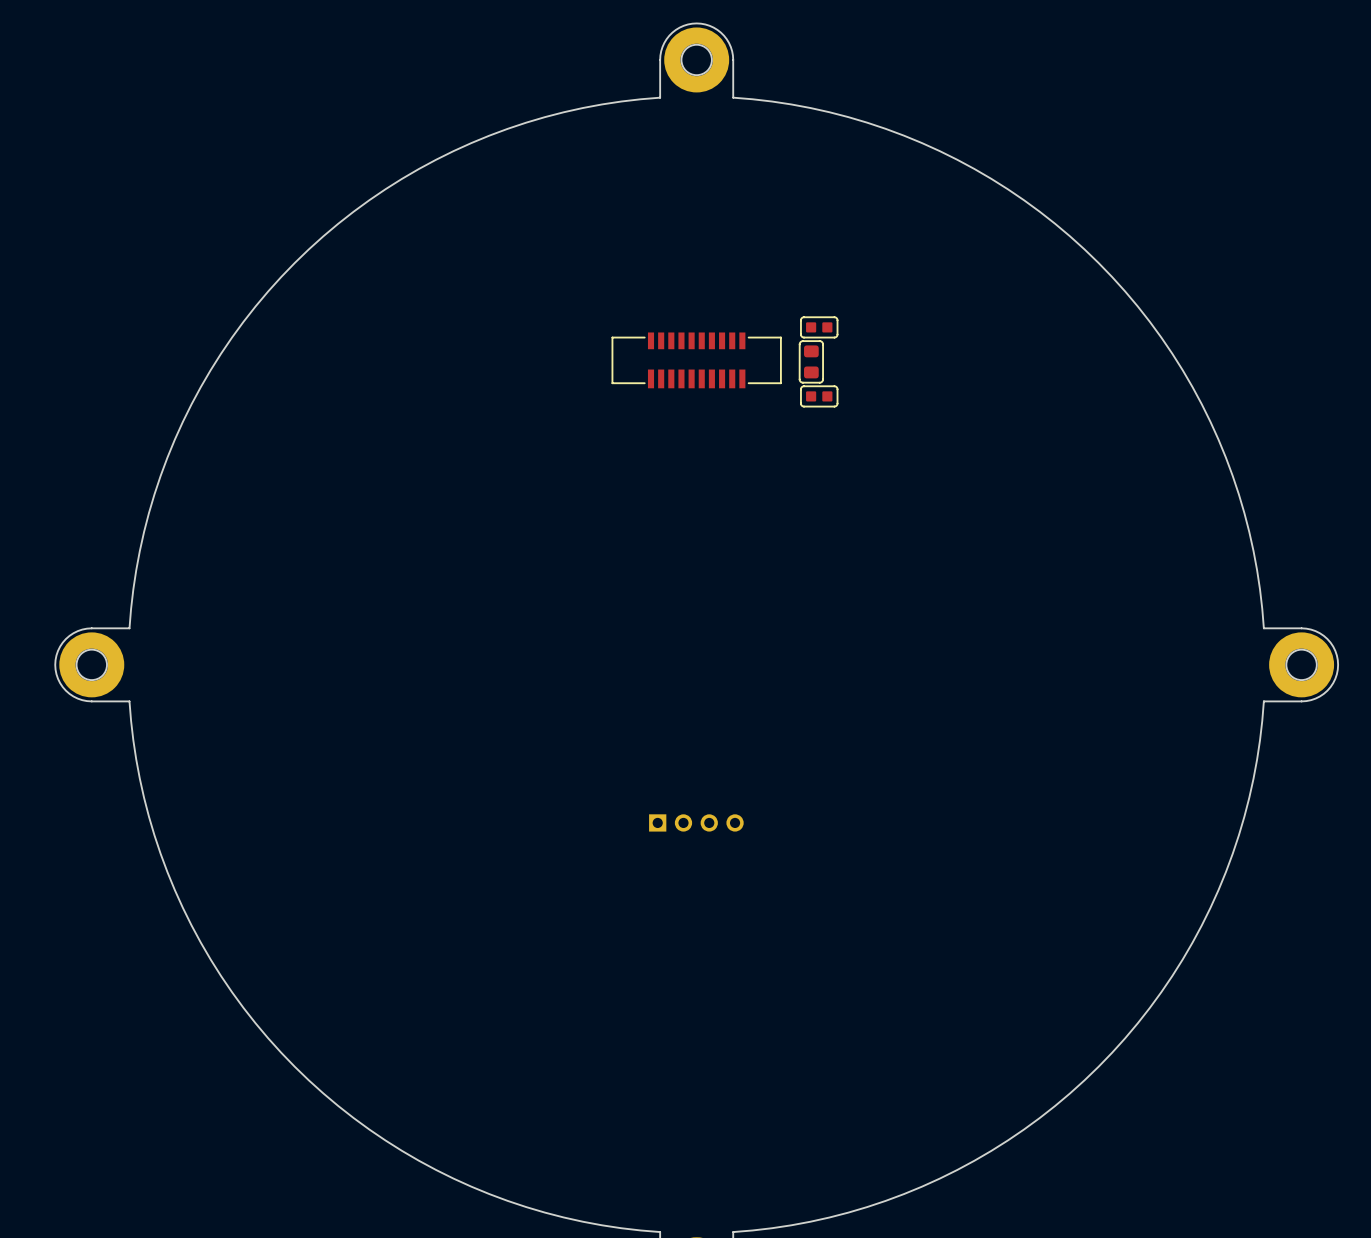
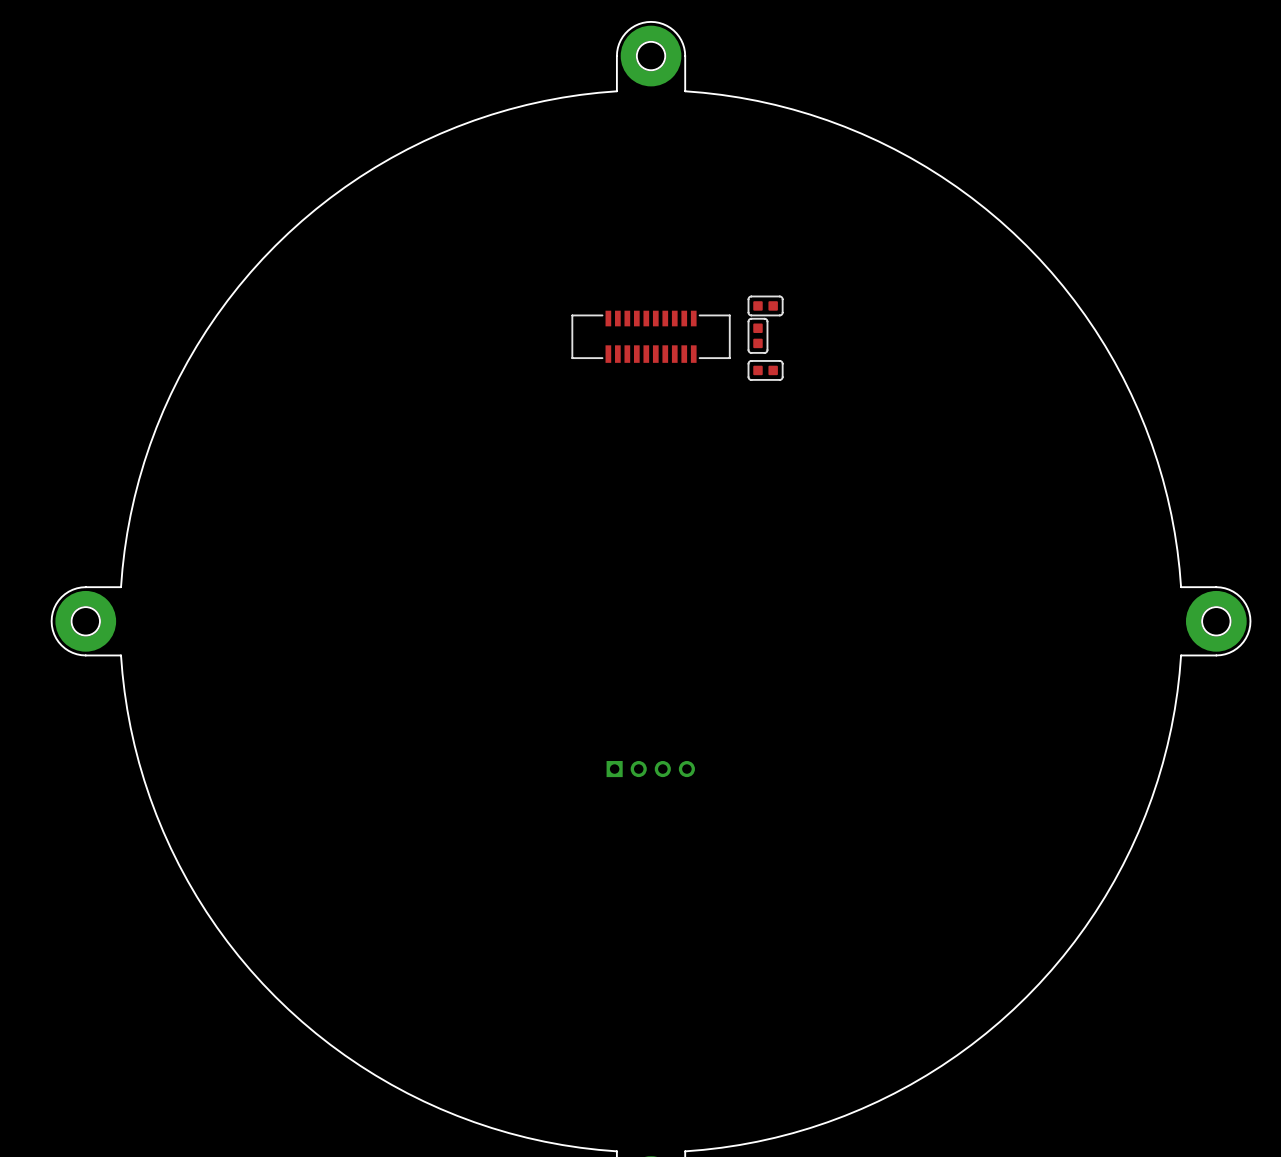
part footprint: [799, 340, 824, 384] -> [748, 318, 768, 354]

